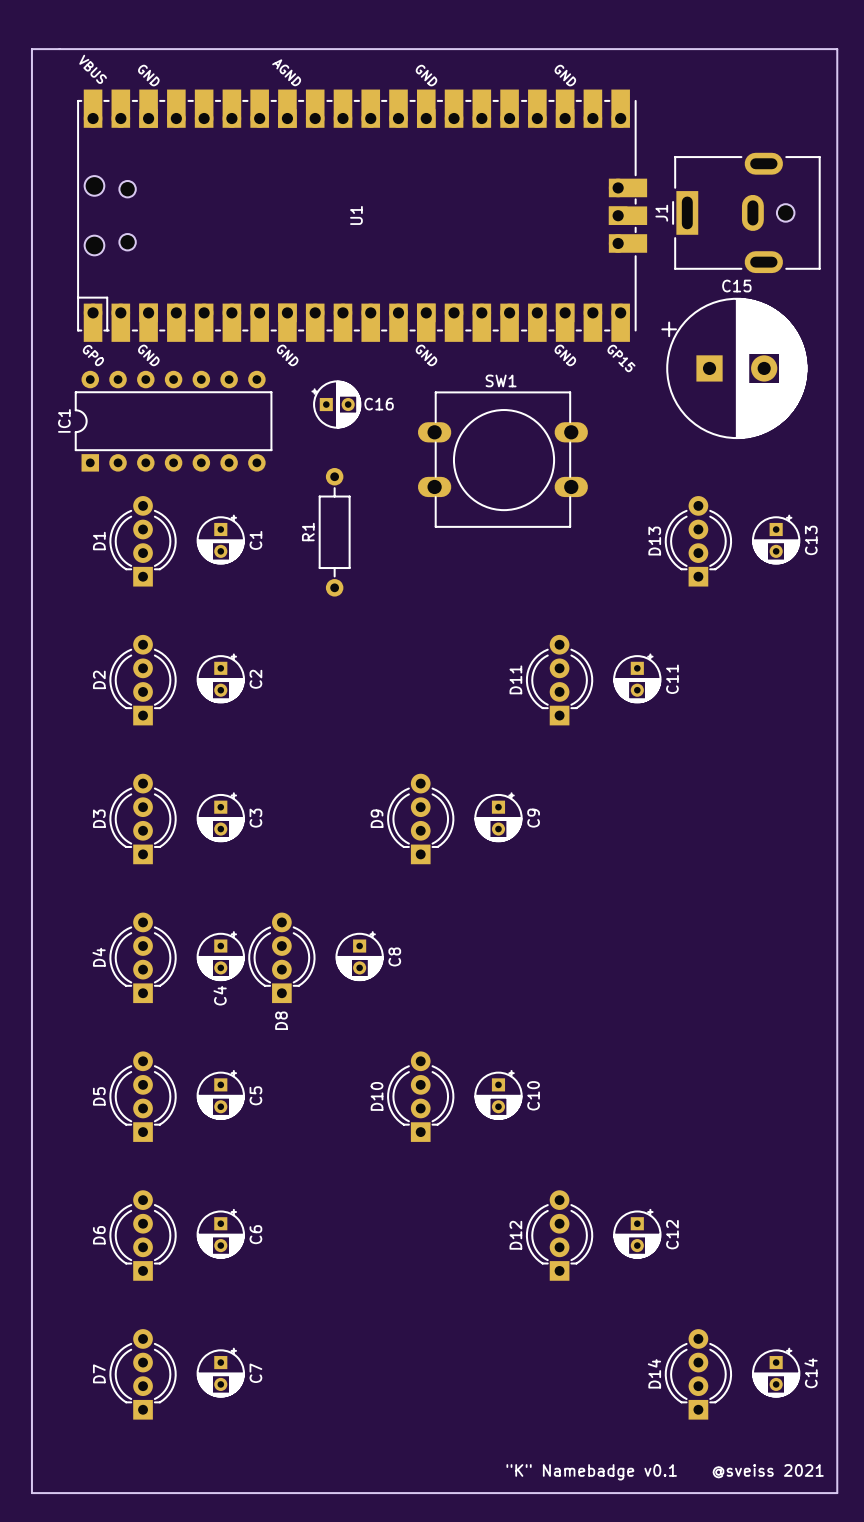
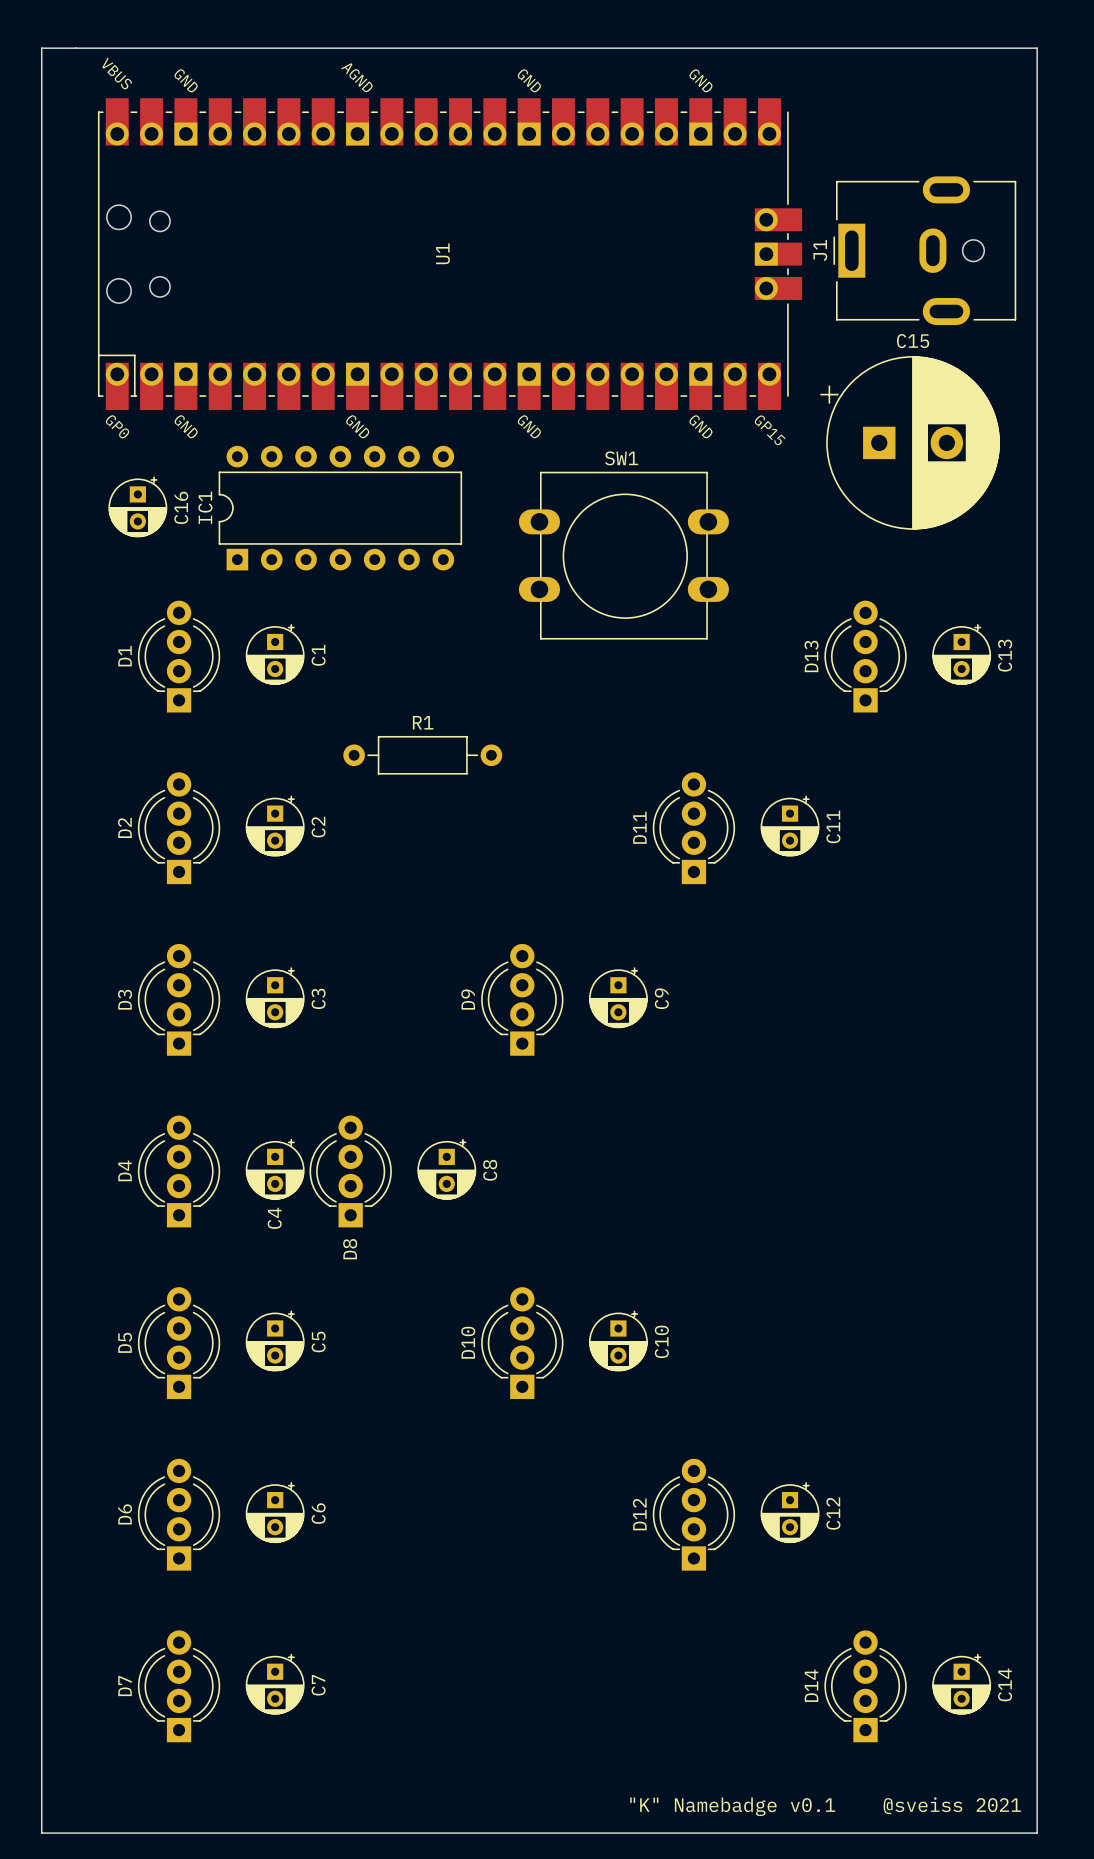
C16 rotation: 0° (336, 404) -> 90° clockwise (137, 506)
C16 position: (336, 404) -> (137, 506)
IC1 position: (173, 421) -> (340, 508)
R1 rotation: 0° (334, 532) -> 90° clockwise (422, 755)
R1 position: (334, 532) -> (422, 755)

